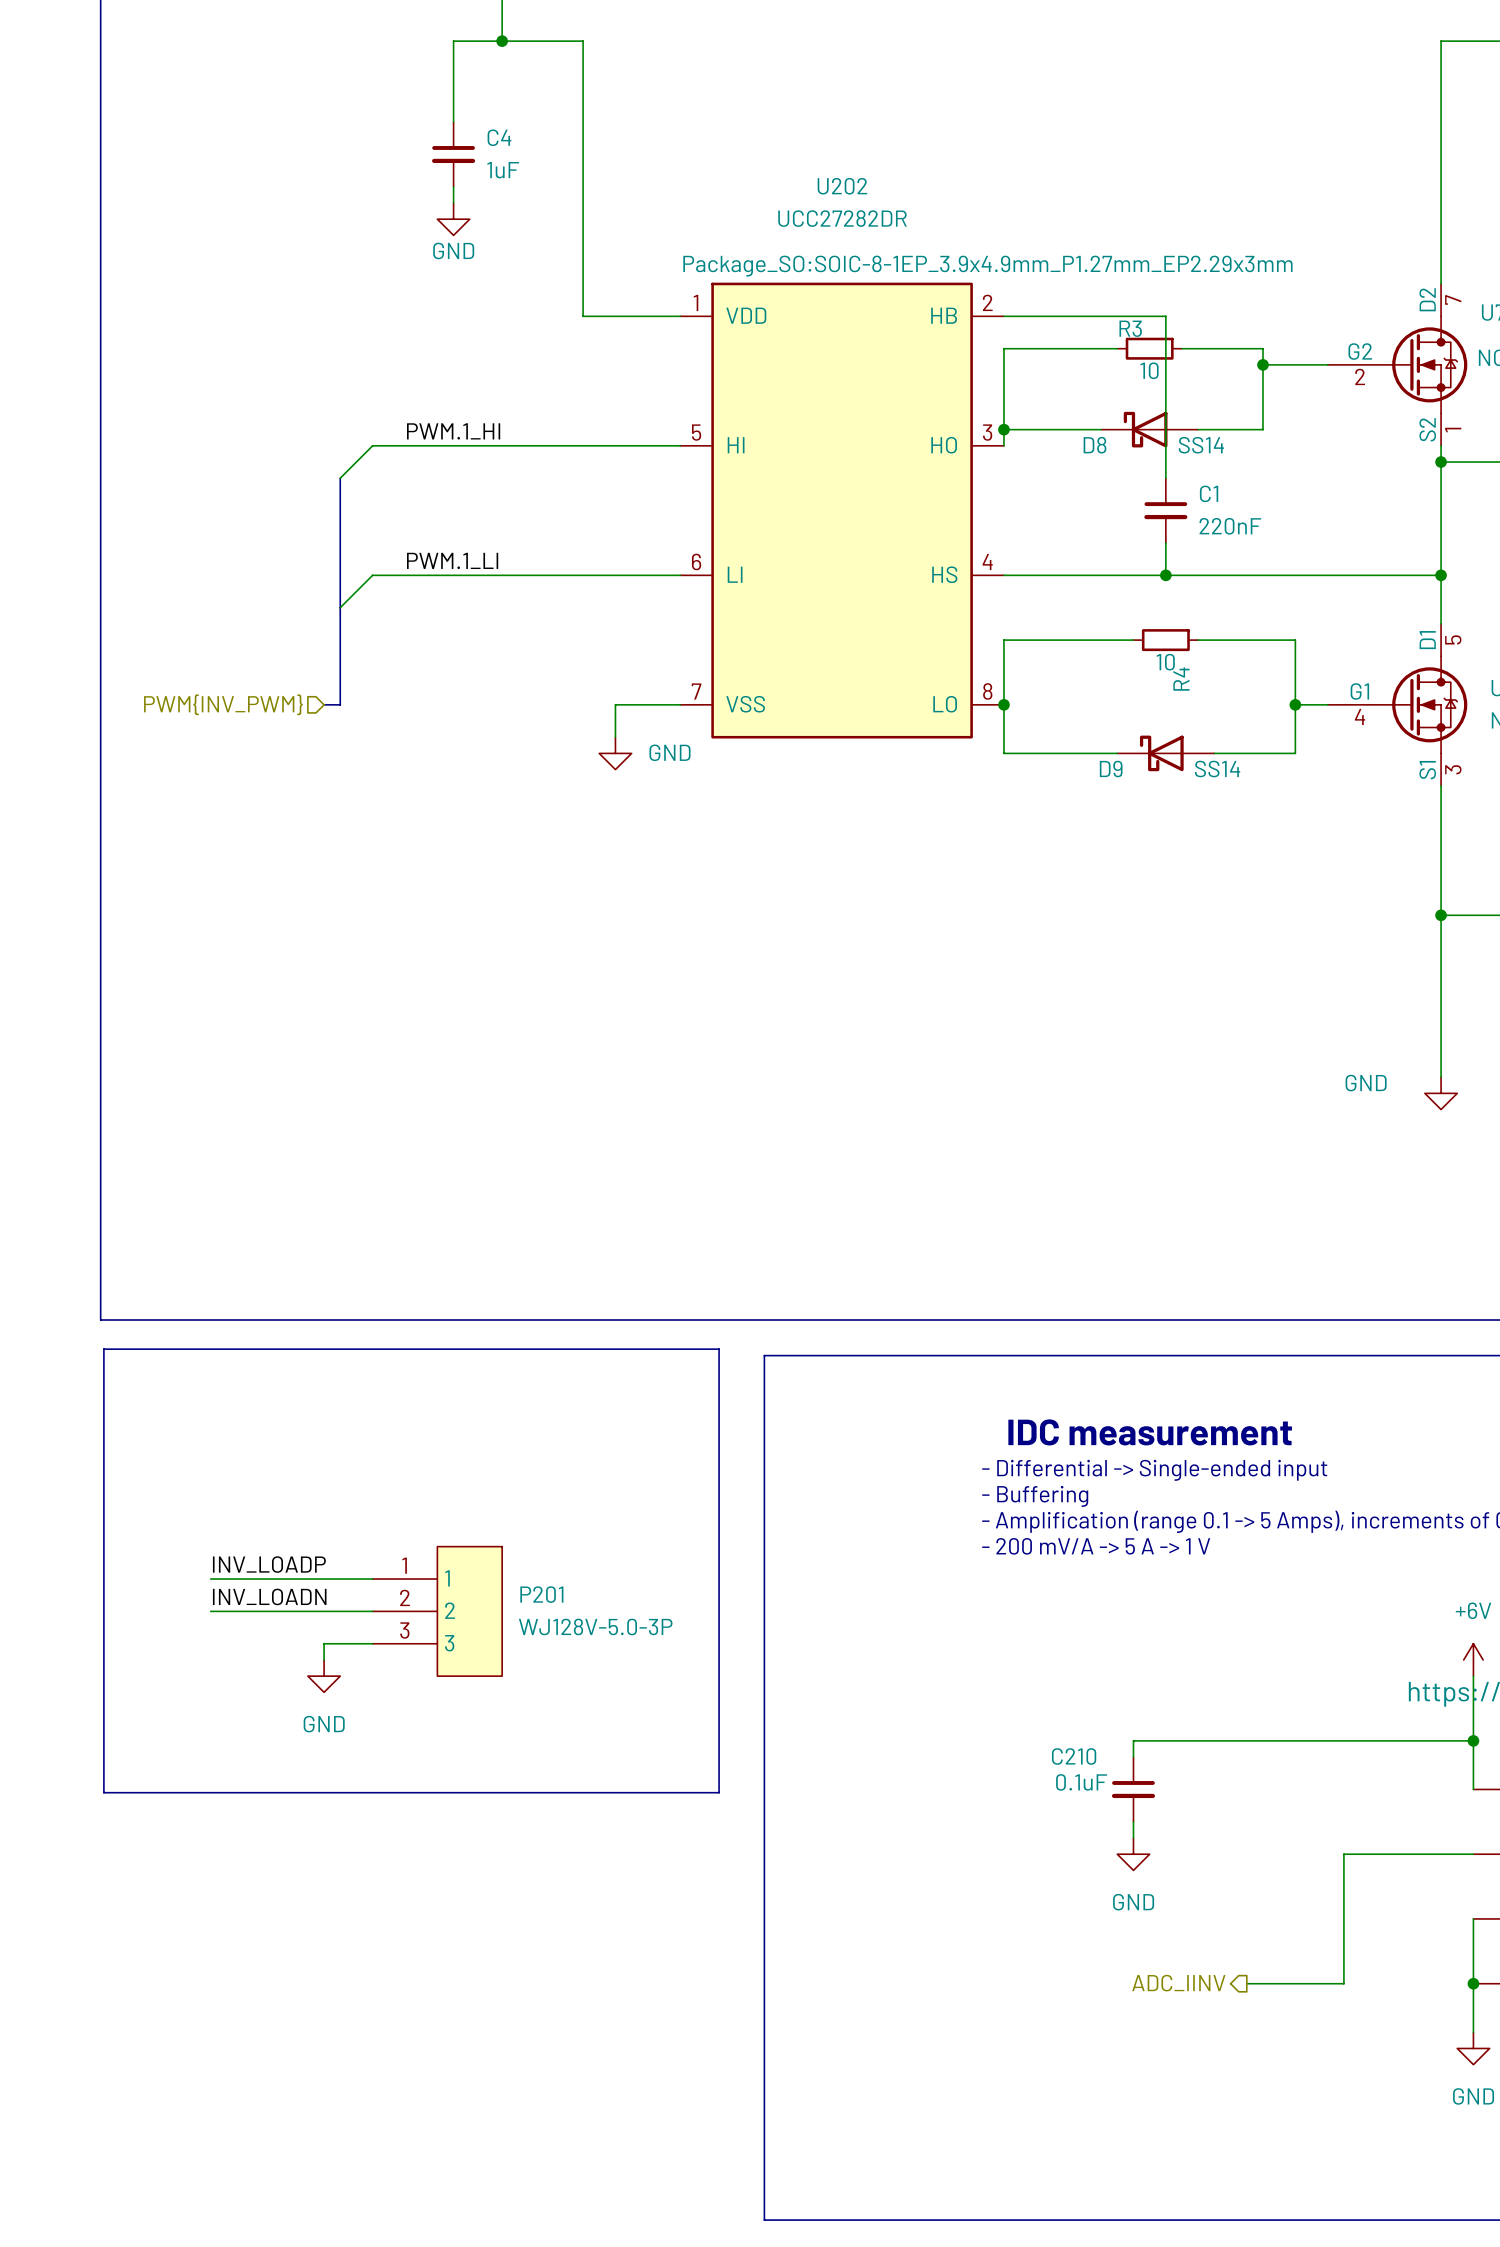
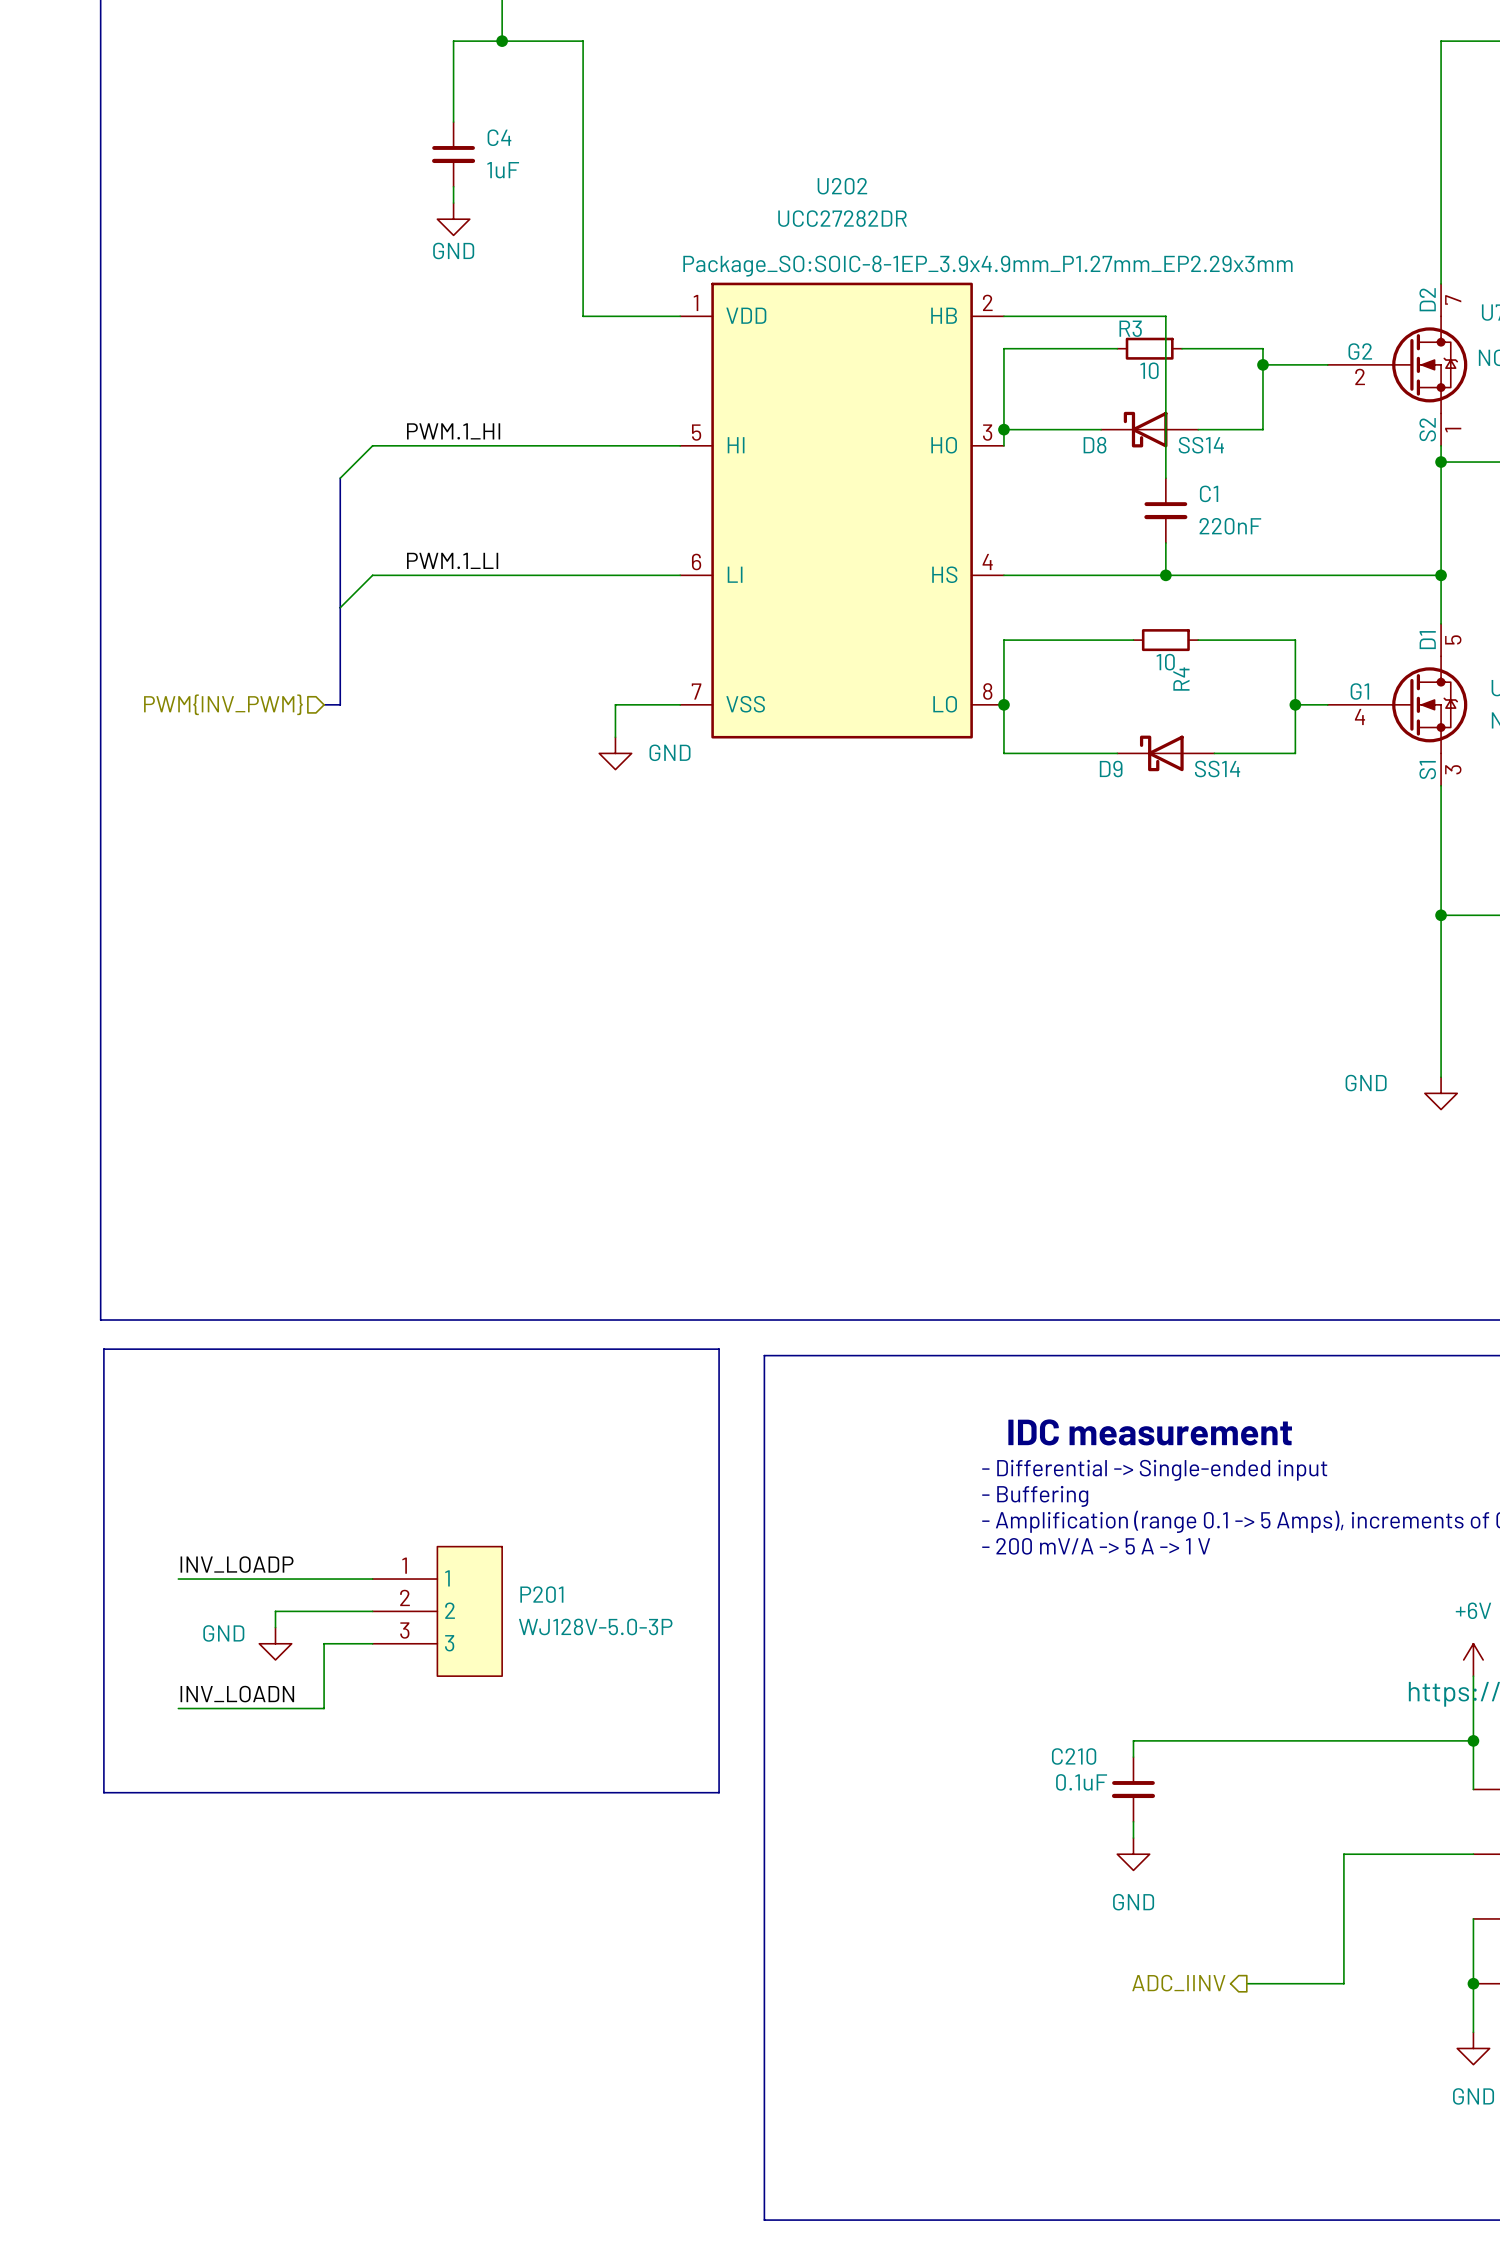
label position: INV_LOADP (269, 1564) -> INV_LOADP (237, 1564)
wire: none -> (178, 1579) (210, 1579)
label position: INV_LOADN (269, 1596) -> INV_LOADN (237, 1694)
wire: (210, 1611) (275, 1611) -> (275, 1627) (275, 1611)
wire: none -> (324, 1659) (324, 1708) (178, 1708)
power symbol position: GND (324, 1676) -> GND (275, 1643)
power symbol text position: GND (324, 1724) -> GND (223, 1633)

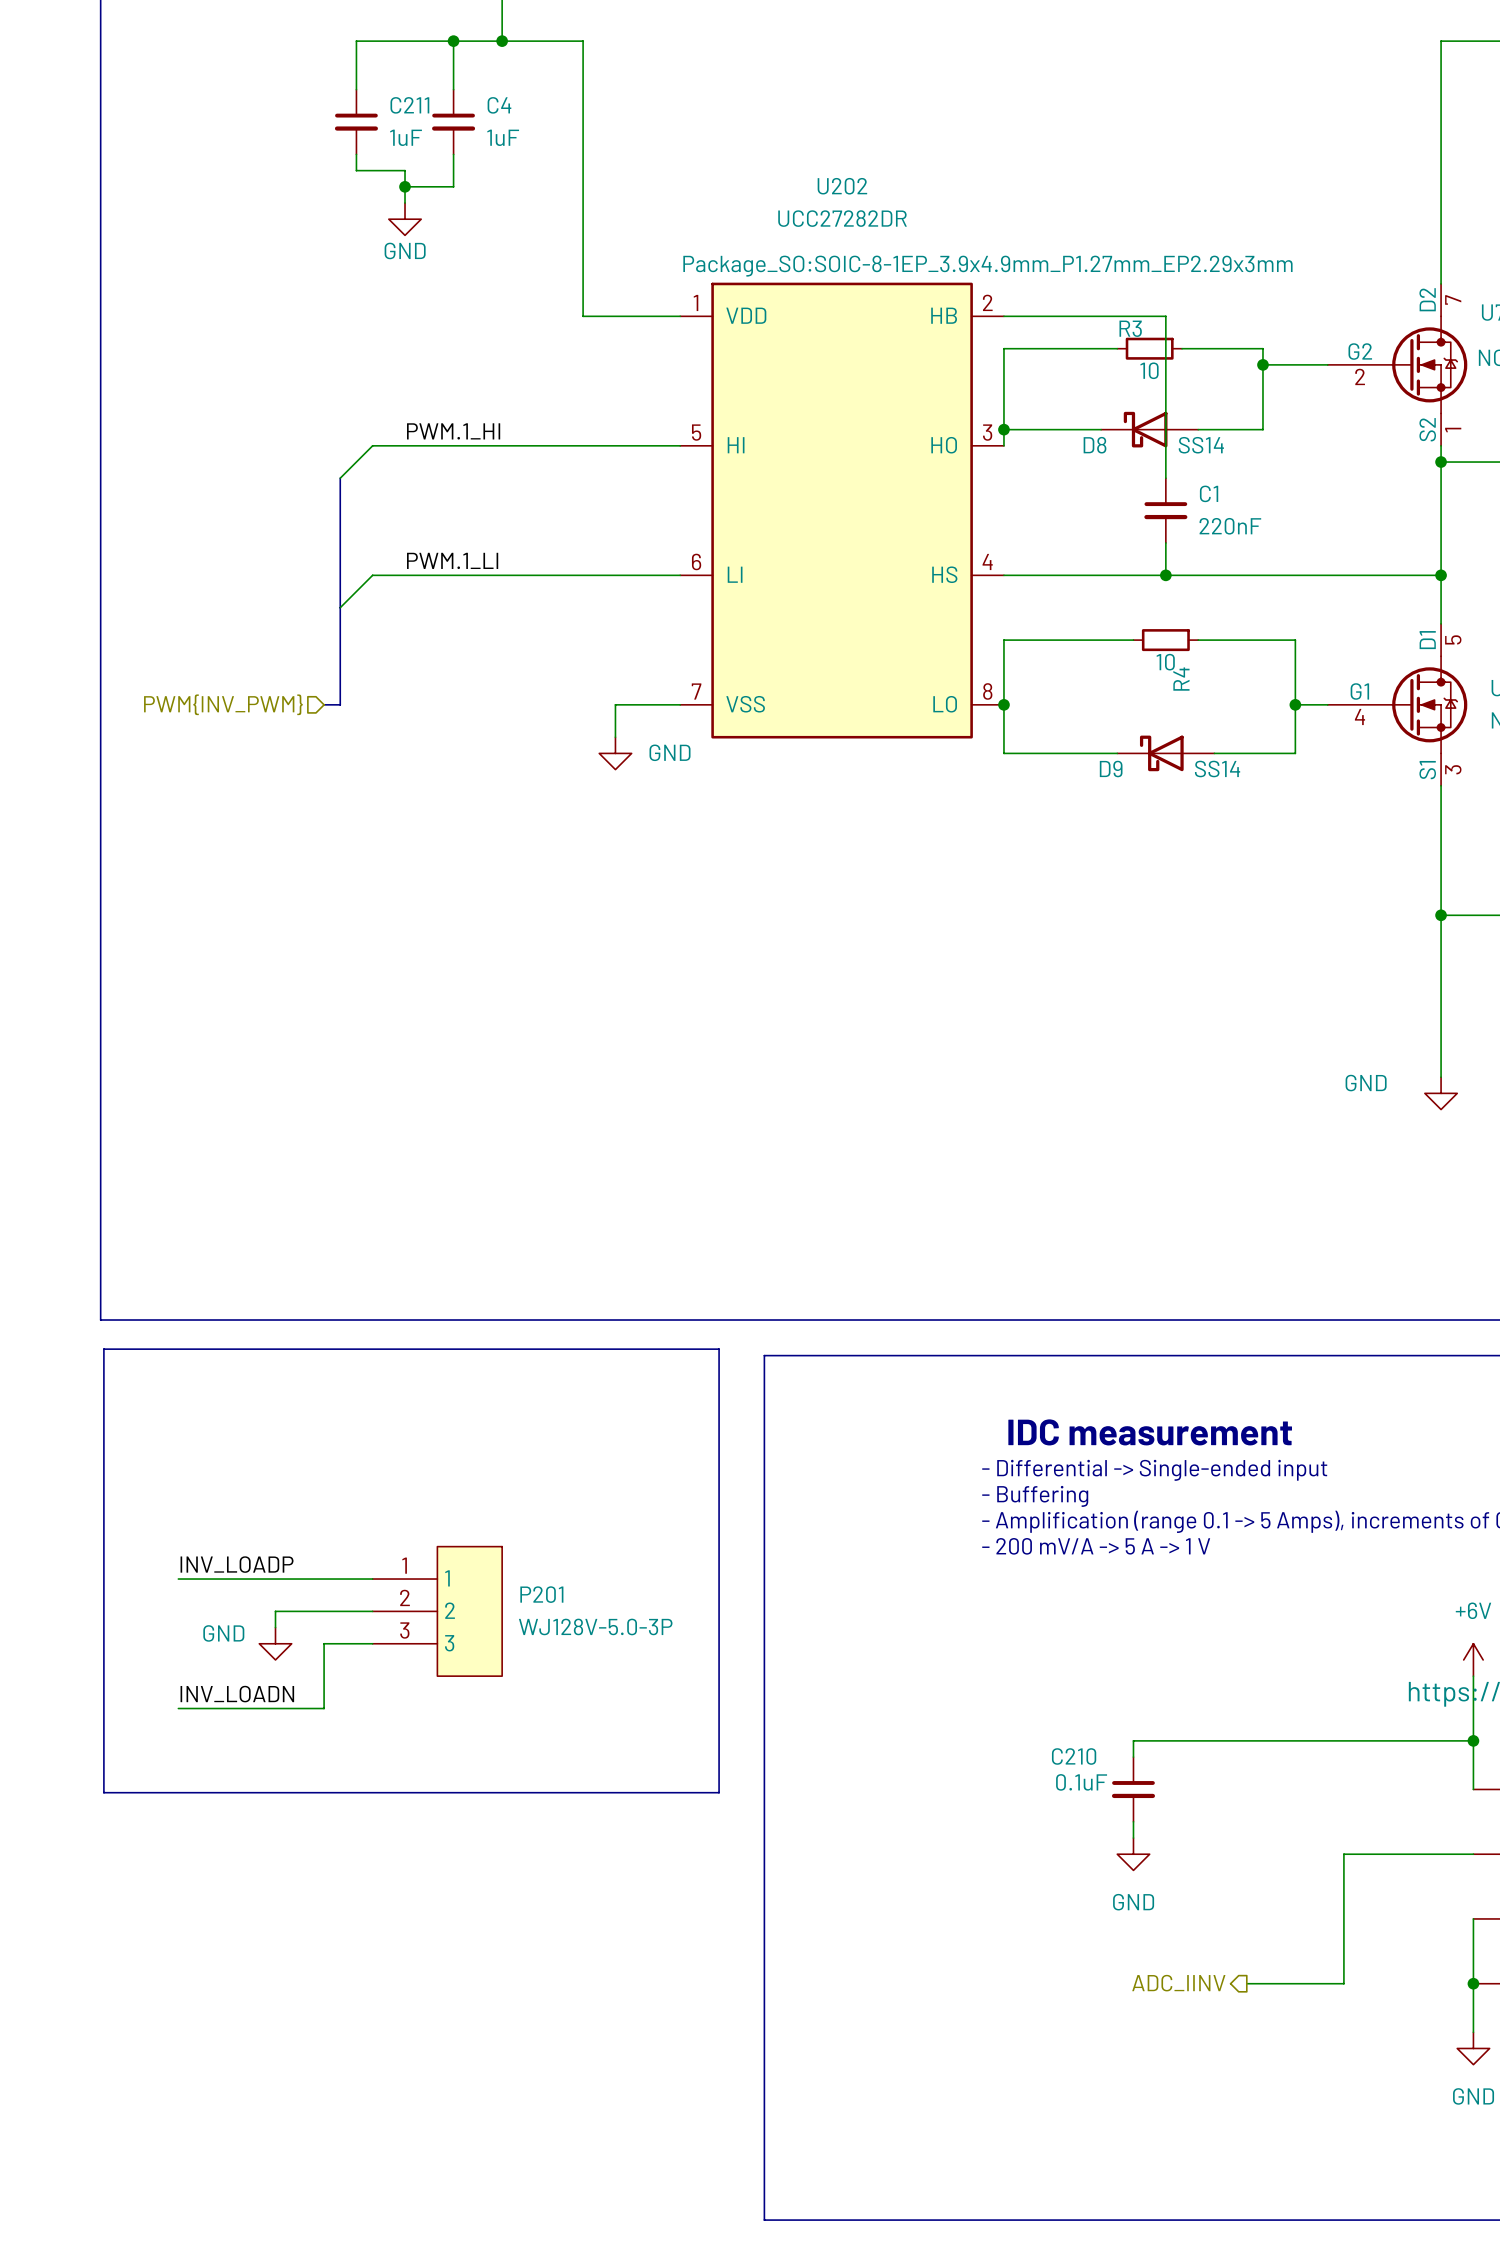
wire: none -> (453, 41) (356, 41) (356, 89)
junction: none -> (453, 41)
C211: none -> 1uF (356, 122)
wire: none -> (356, 154) (356, 170) (405, 170) (405, 203)
wire: none -> (453, 154) (453, 186) (405, 186)
C4 position: (453, 154) -> (453, 122)
junction: none -> (405, 186)
wire: (453, 186) (453, 203) -> none
power symbol position: GND (453, 219) -> GND (405, 219)

